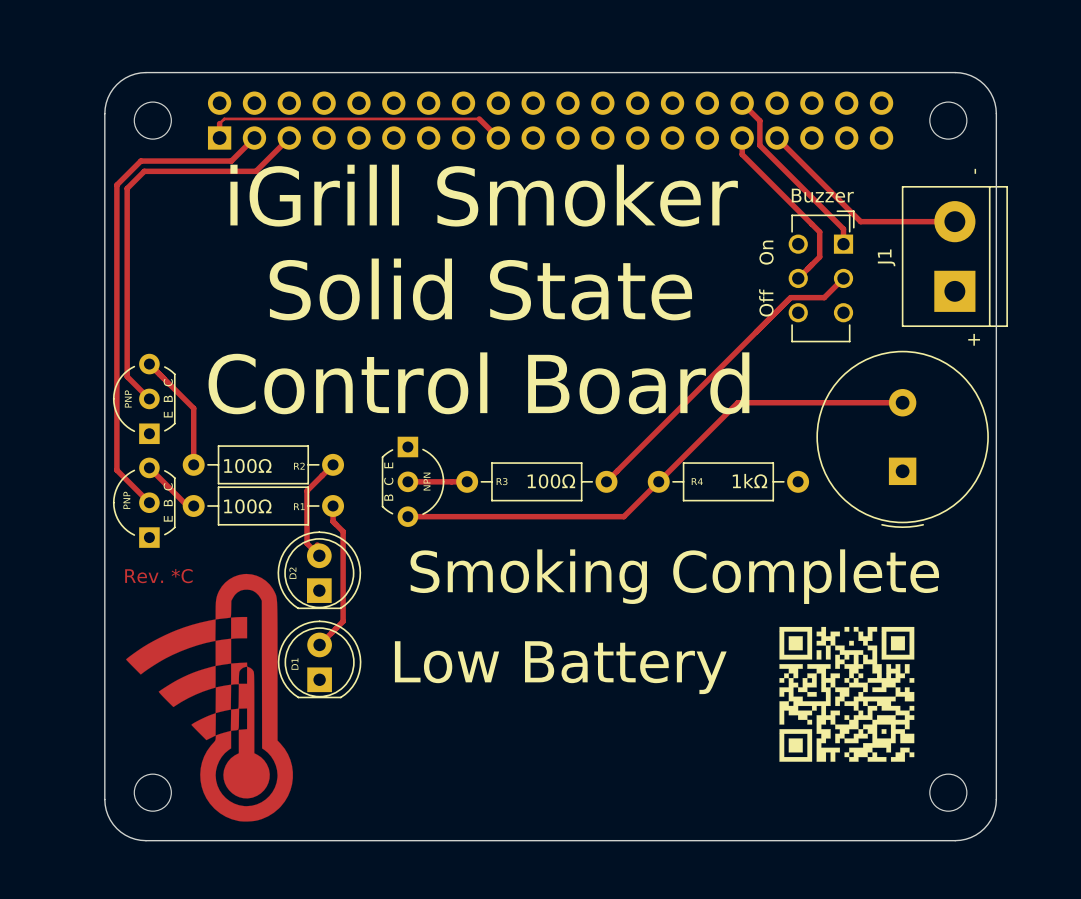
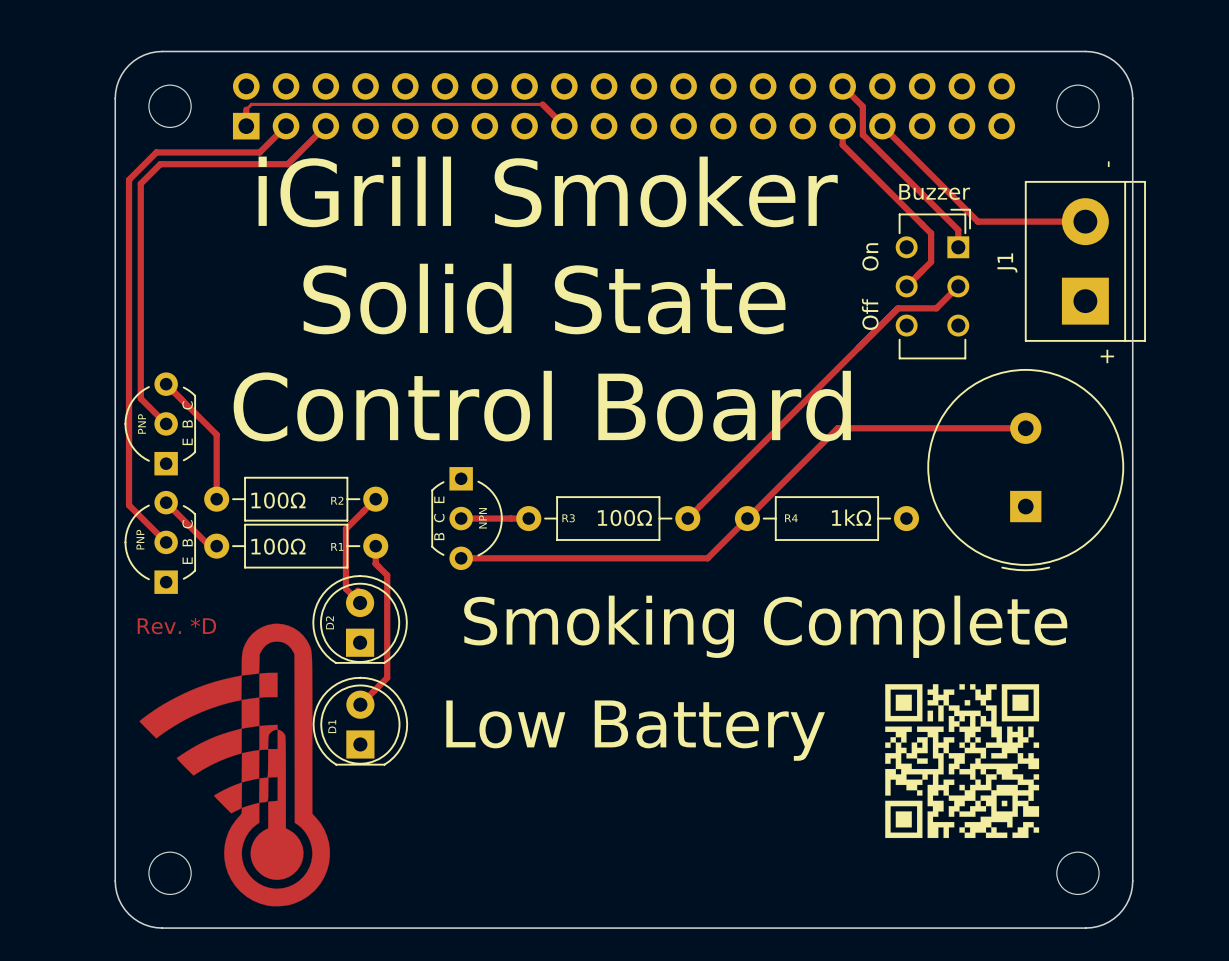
text: Rev. *C (158, 576) -> Rev. *D (176, 626)

